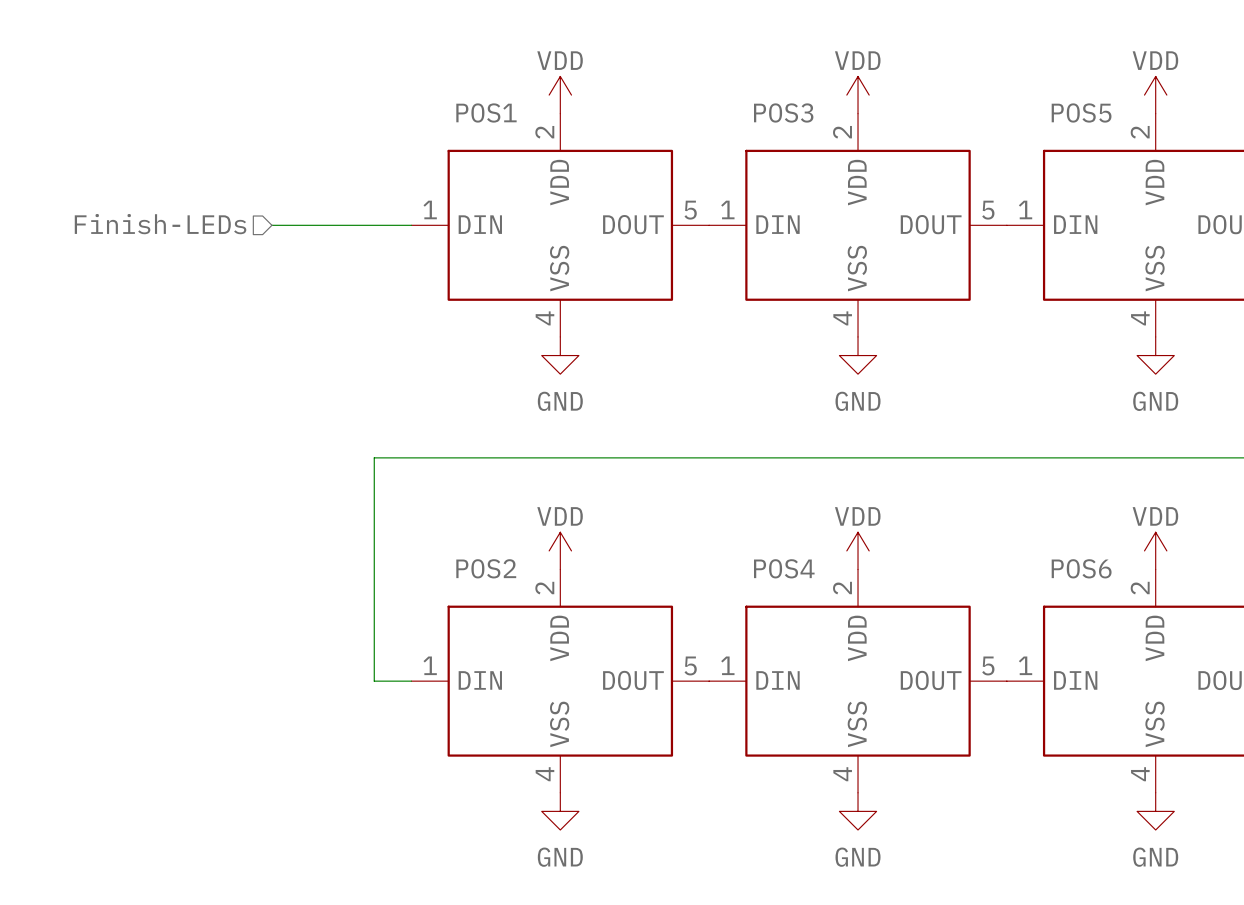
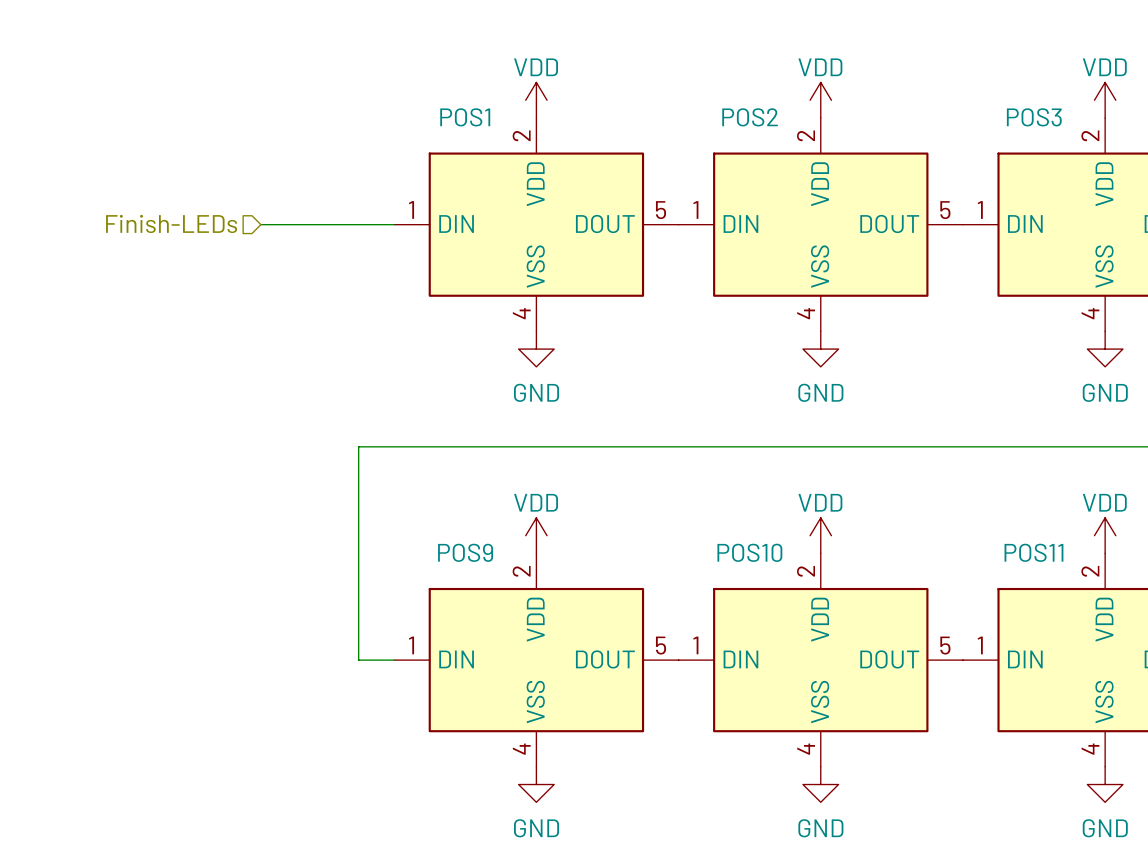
POS3 name: POS3 (783, 112) -> POS2 (750, 117)
POS5 name: POS5 (1081, 112) -> POS3 (1034, 117)
POS2 name: POS2 (486, 568) -> POS9 (465, 552)
POS4 name: POS4 (784, 568) -> POS10 (749, 552)
POS6 name: POS6 (1081, 568) -> POS11 (1033, 552)

